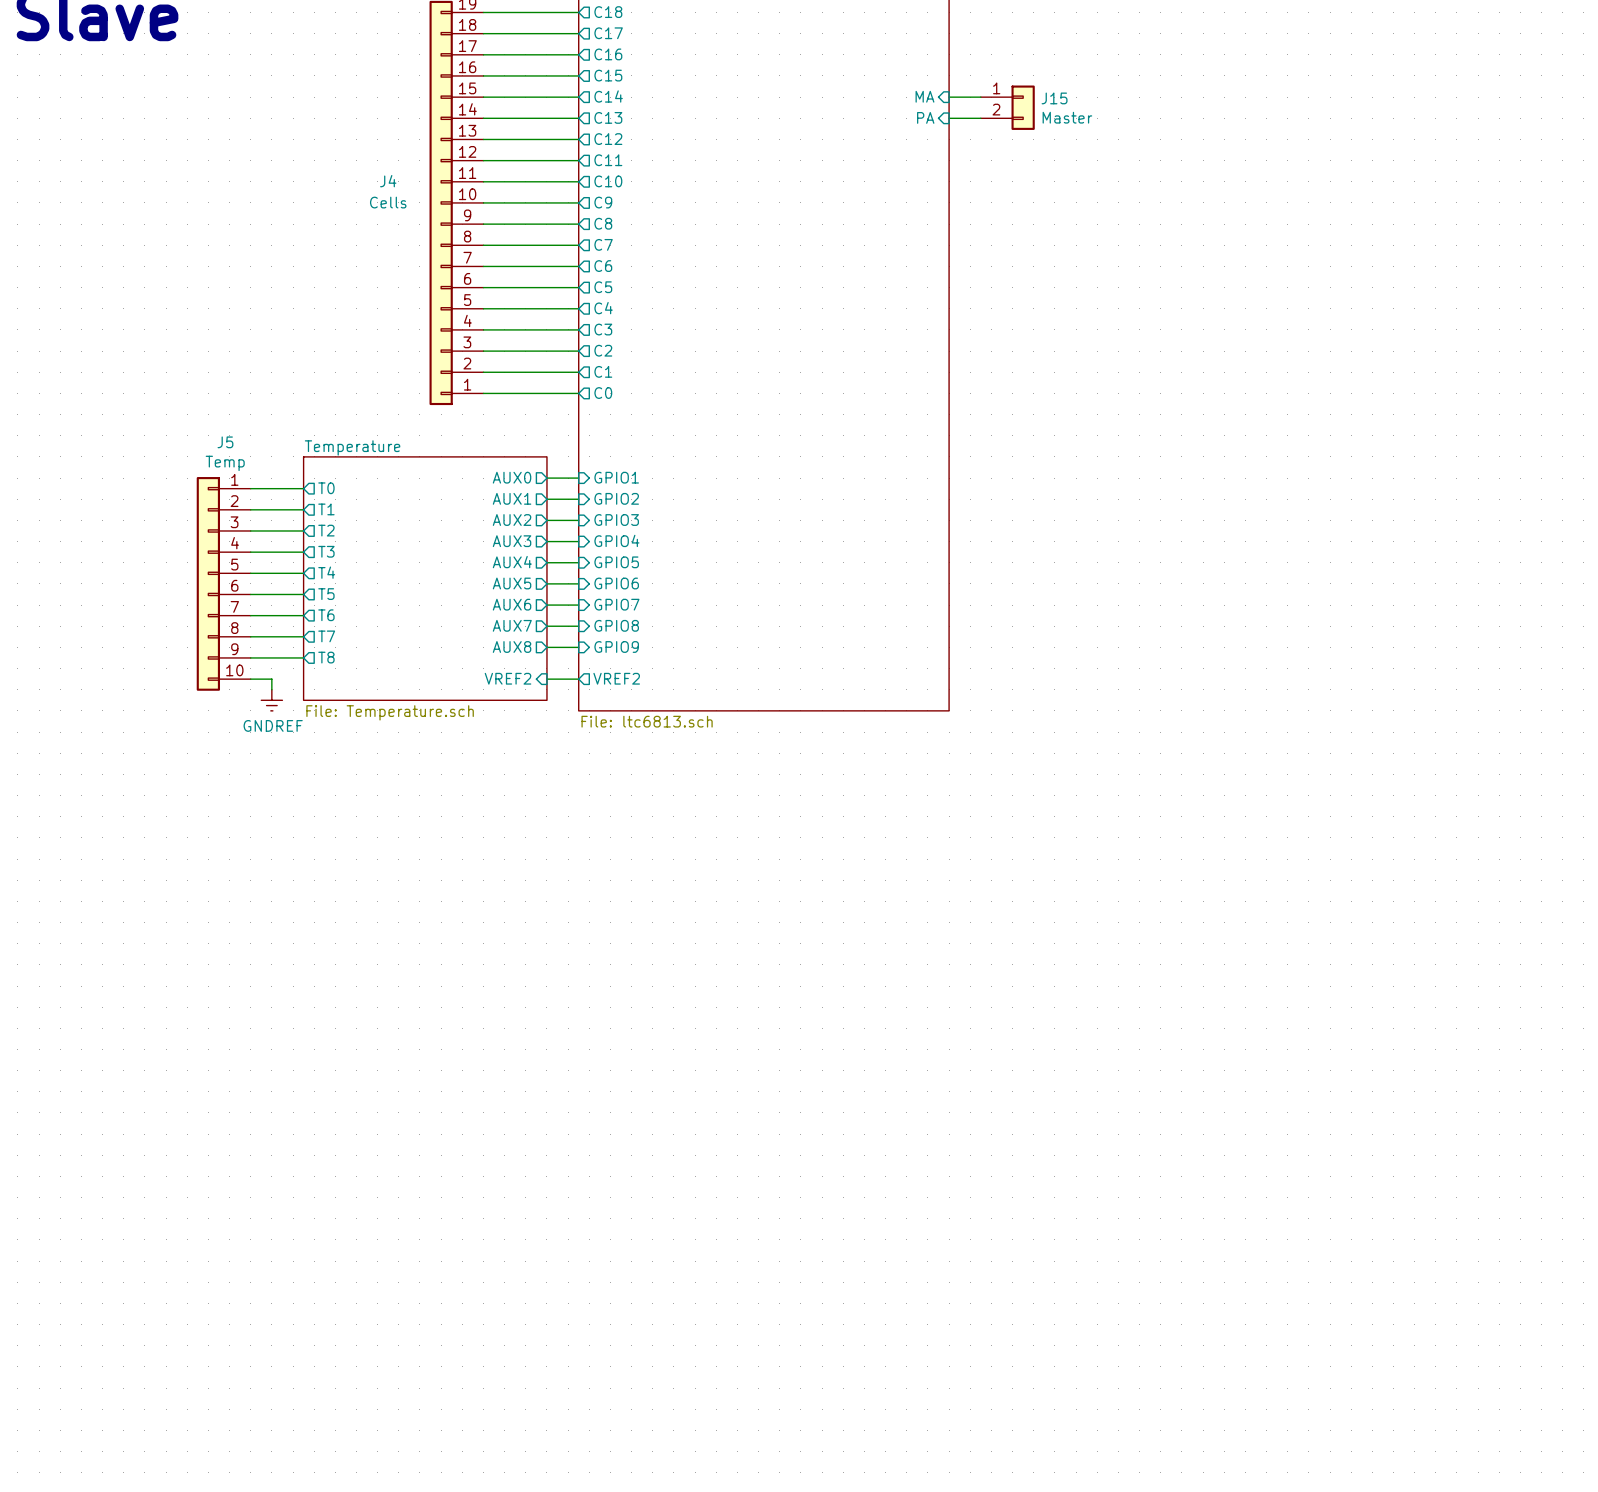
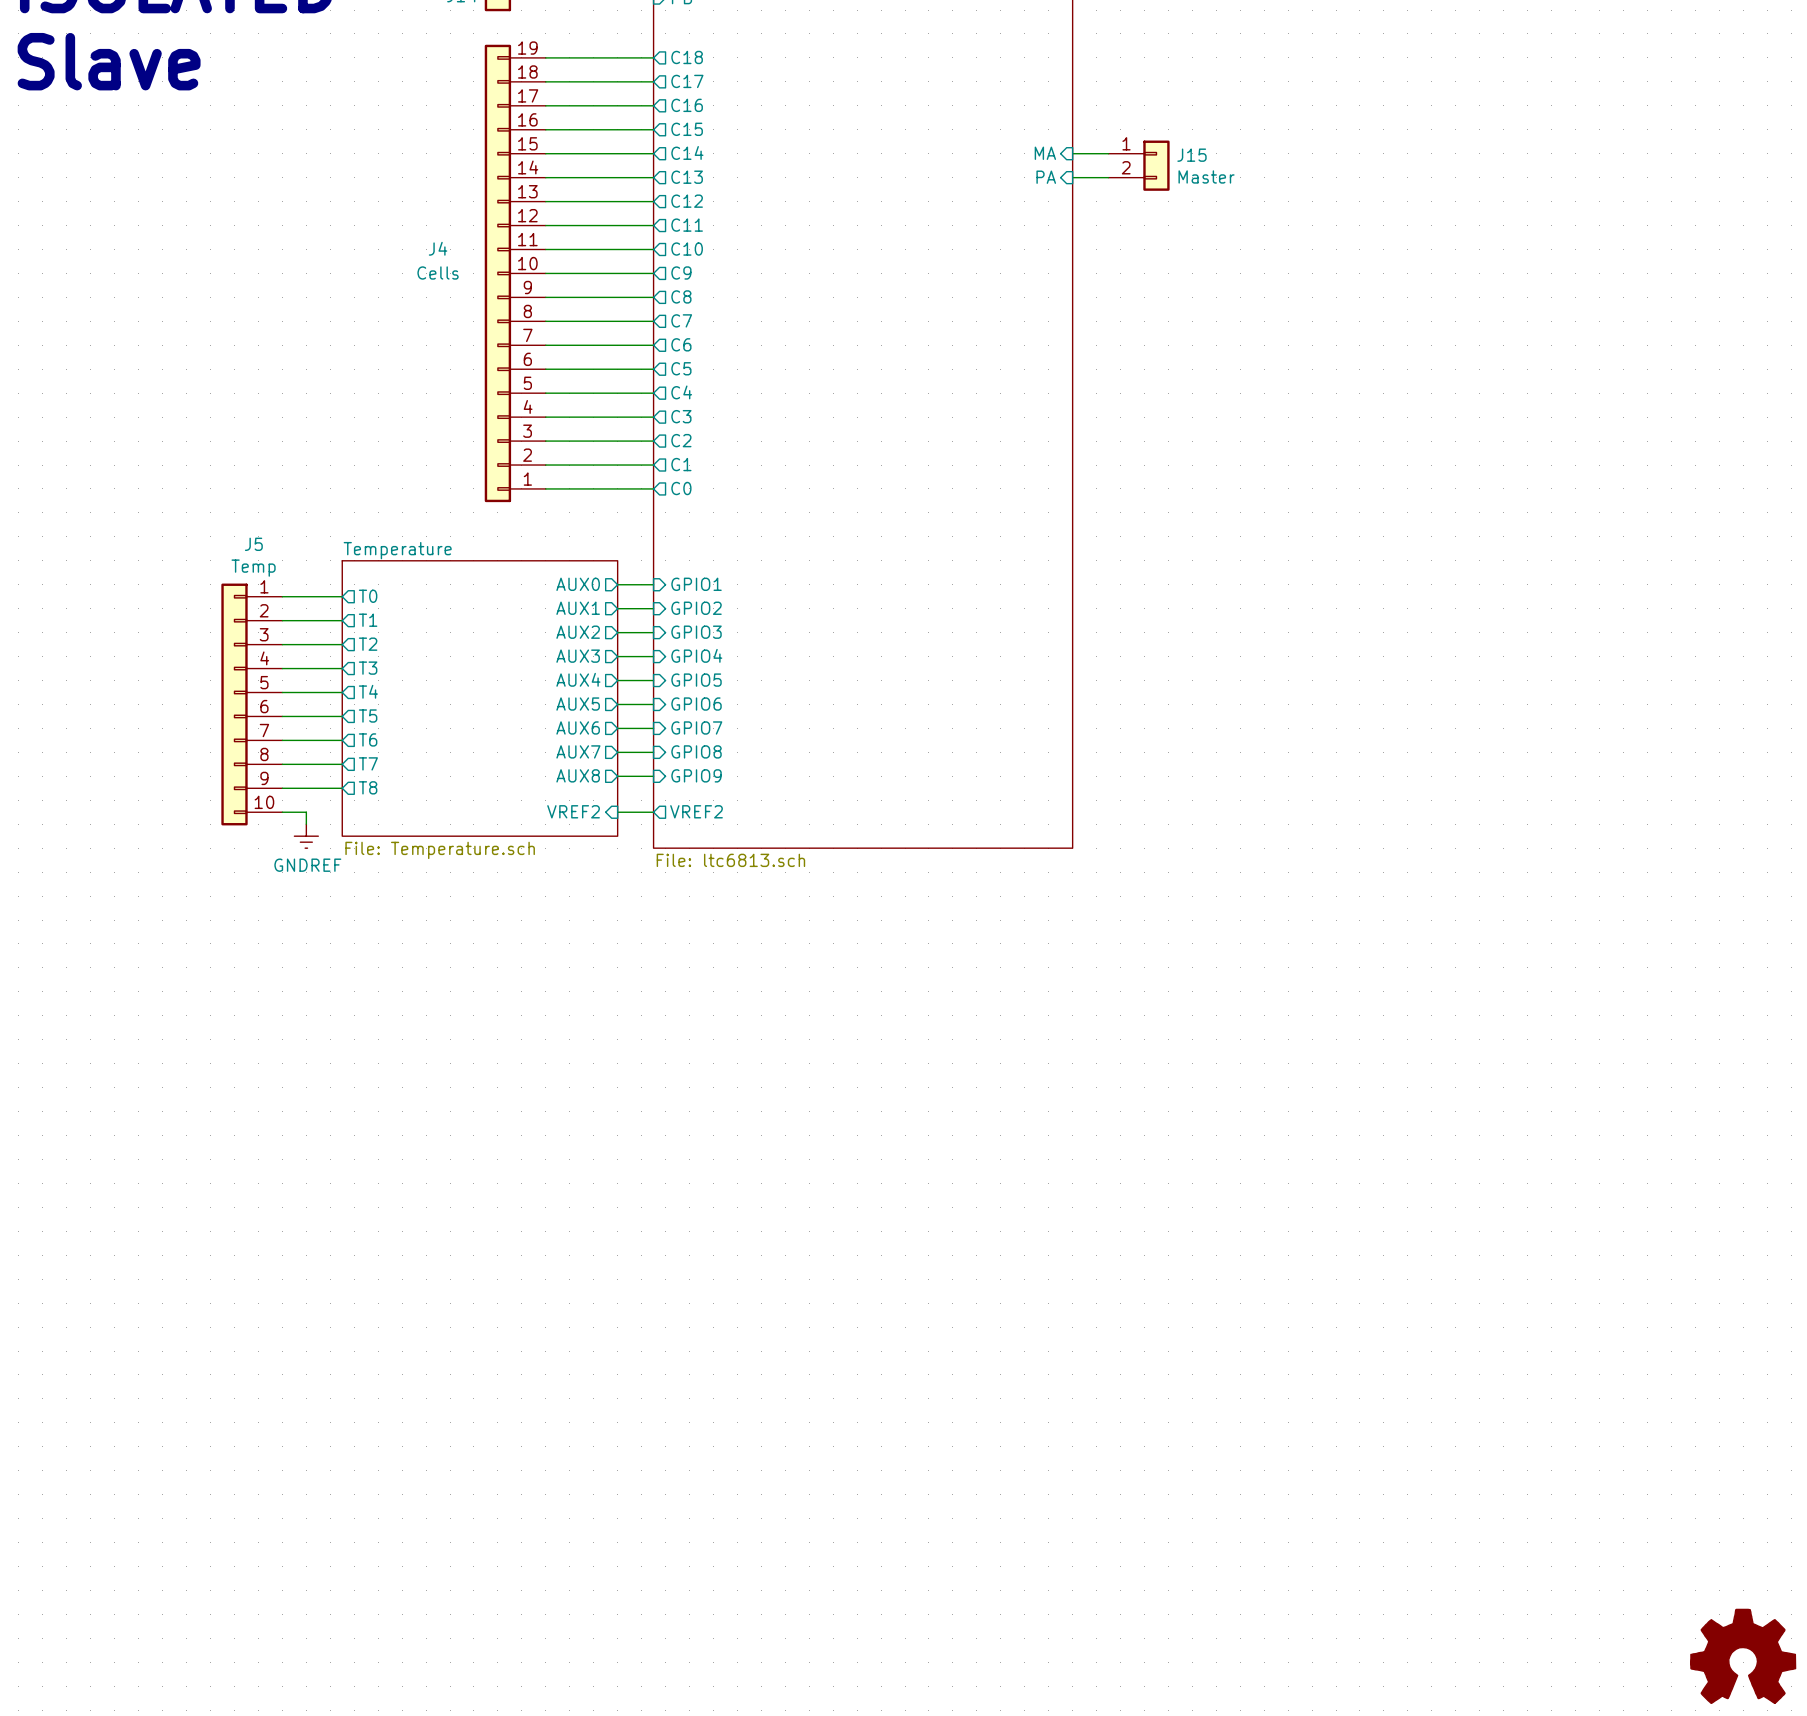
part: none -> (1743, 1656)

